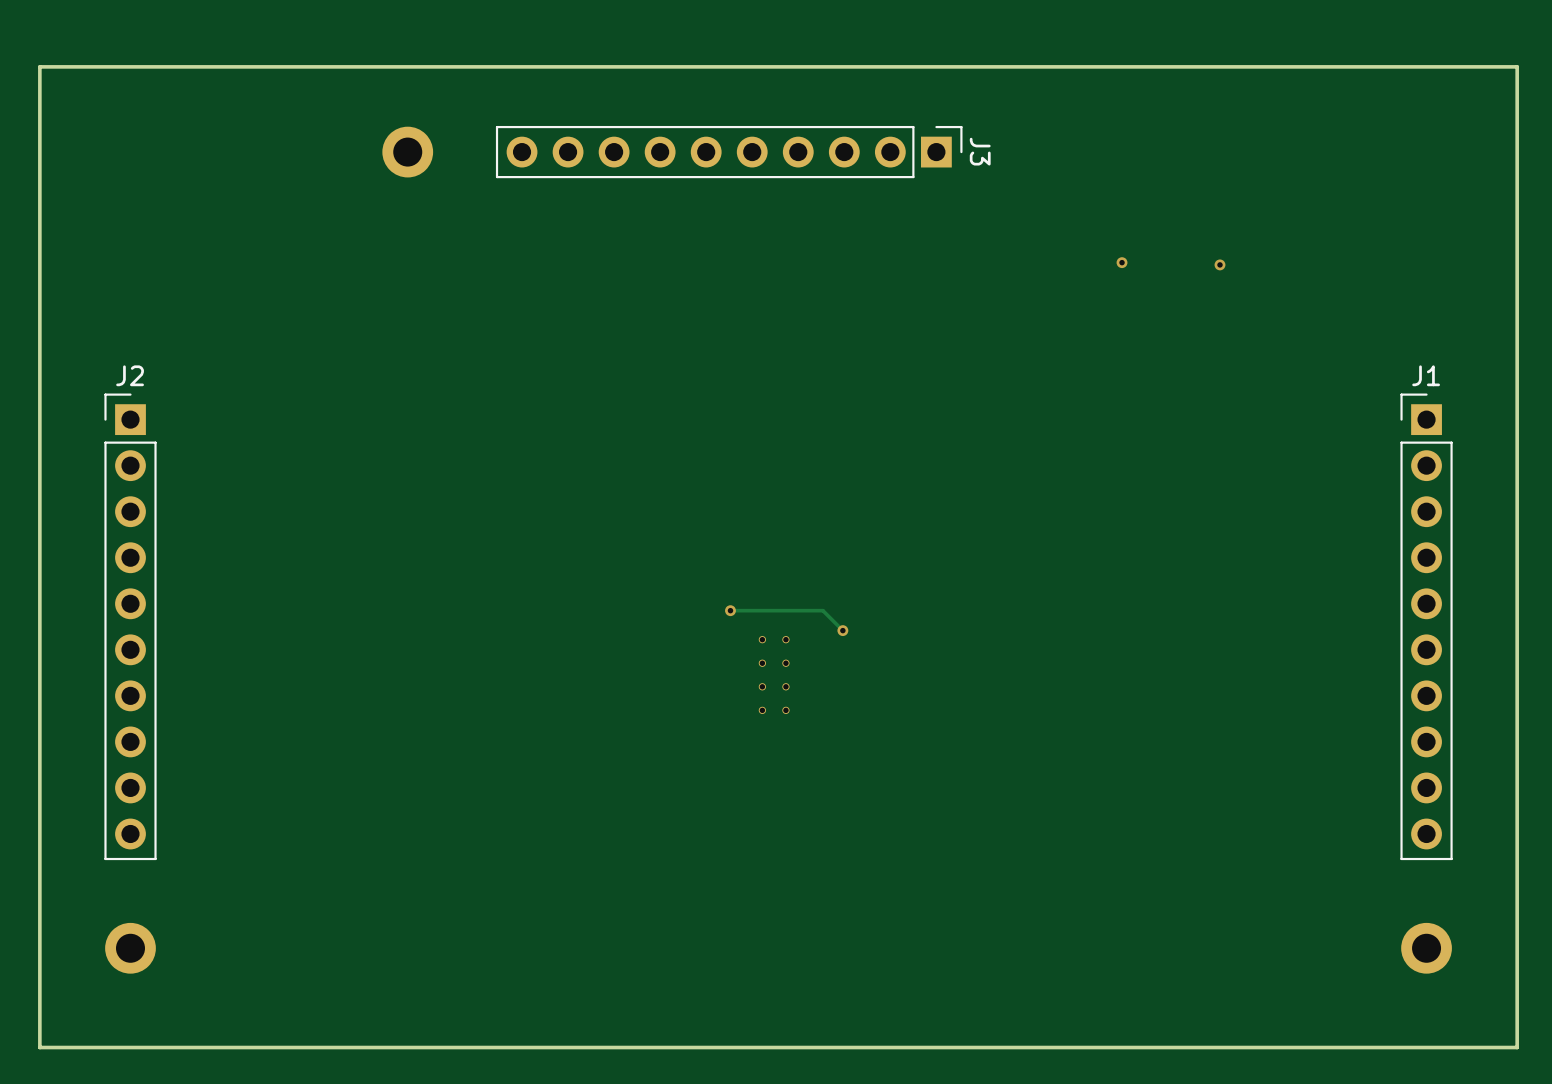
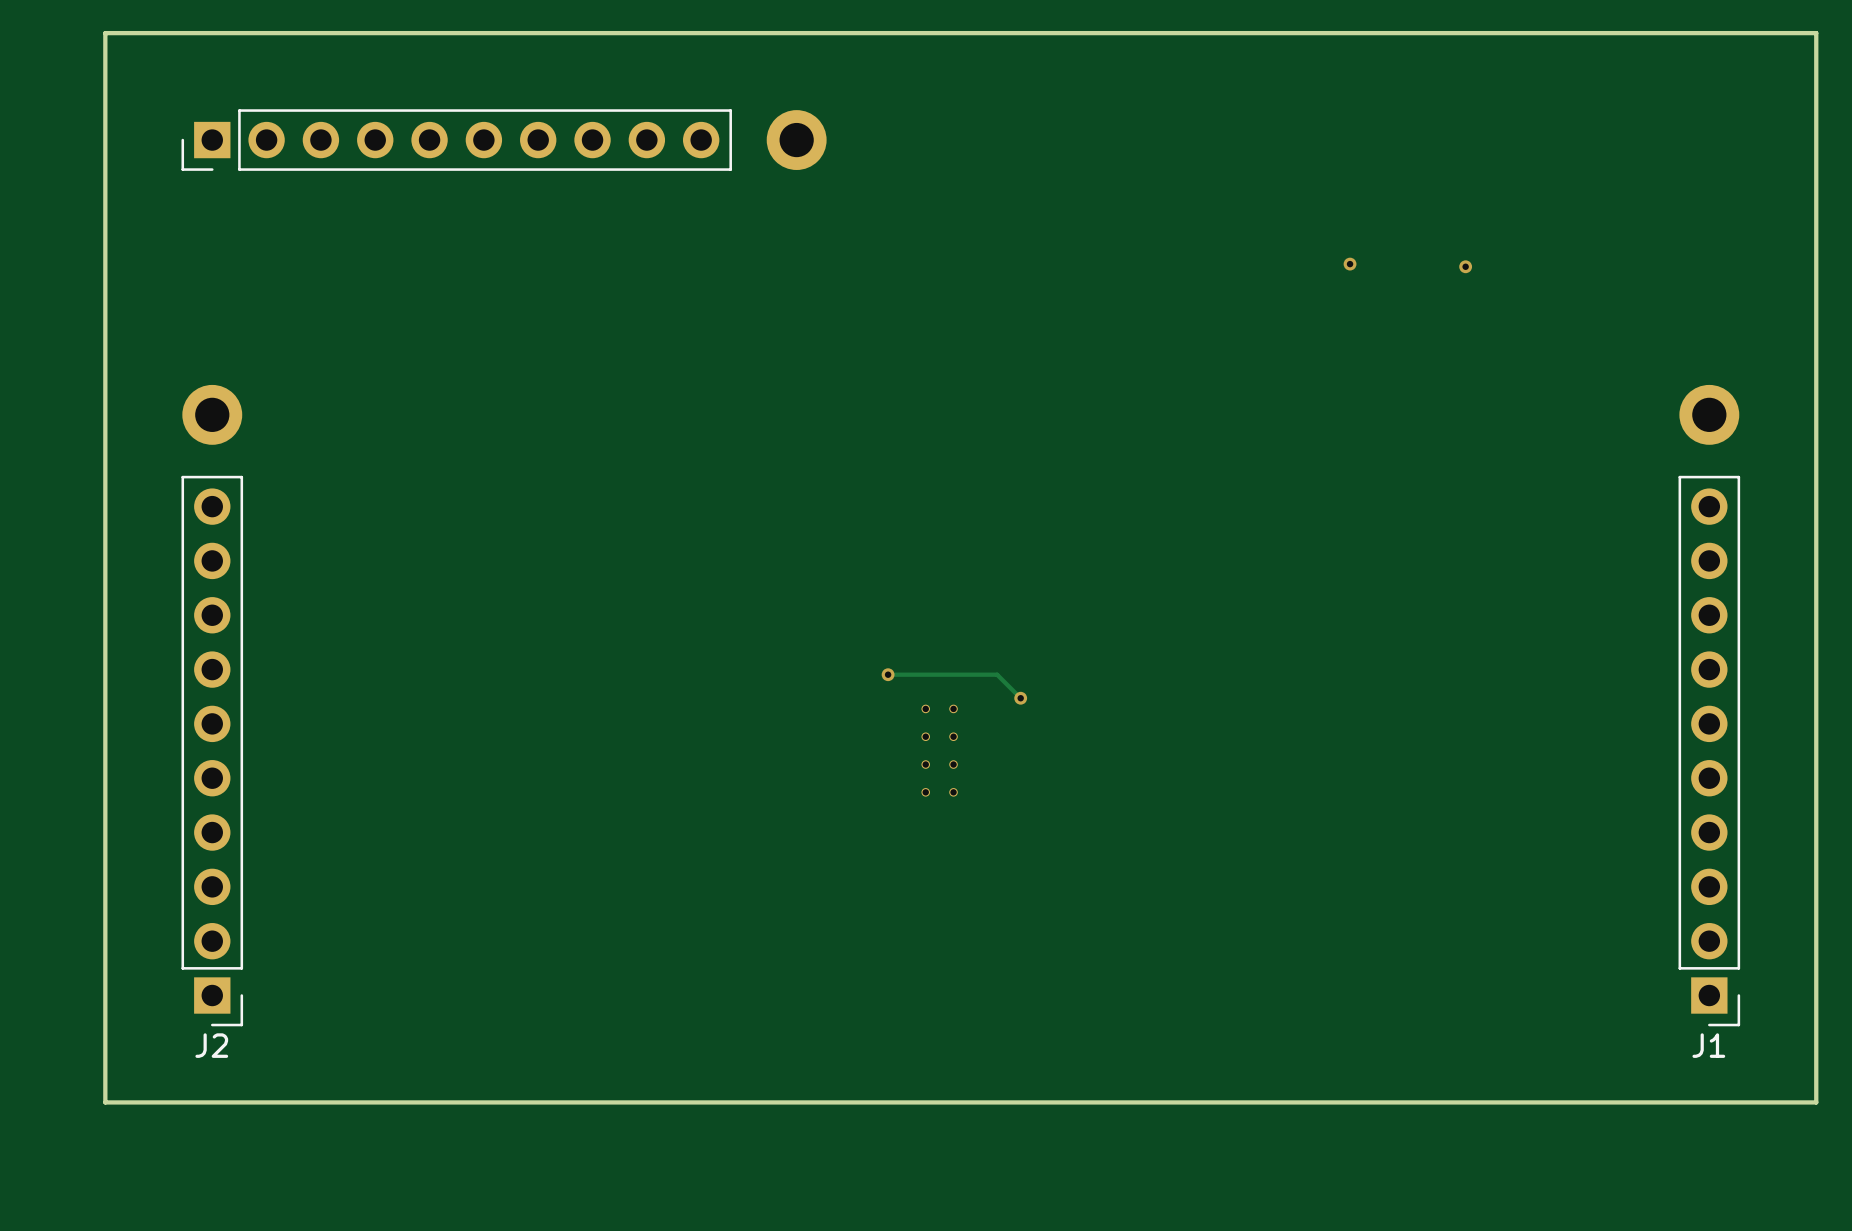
board edge: (67, 66) (39, 66) (39, 1047) (1517, 1047) (1517, 973) -> (105, 33) (105, 1102) (1816, 1102)
part: (407, 152) -> none
J3: (729, 152) -> none
part: none -> (456, 140)
part: none -> (796, 140)
part: none -> (212, 414)
part: none -> (1709, 414)
J2 rotation: 0° (130, 626) -> 180° (212, 751)
J1 rotation: 0° (1426, 626) -> 180° (1709, 751)
part: (130, 948) -> none
part: (1426, 948) -> none

